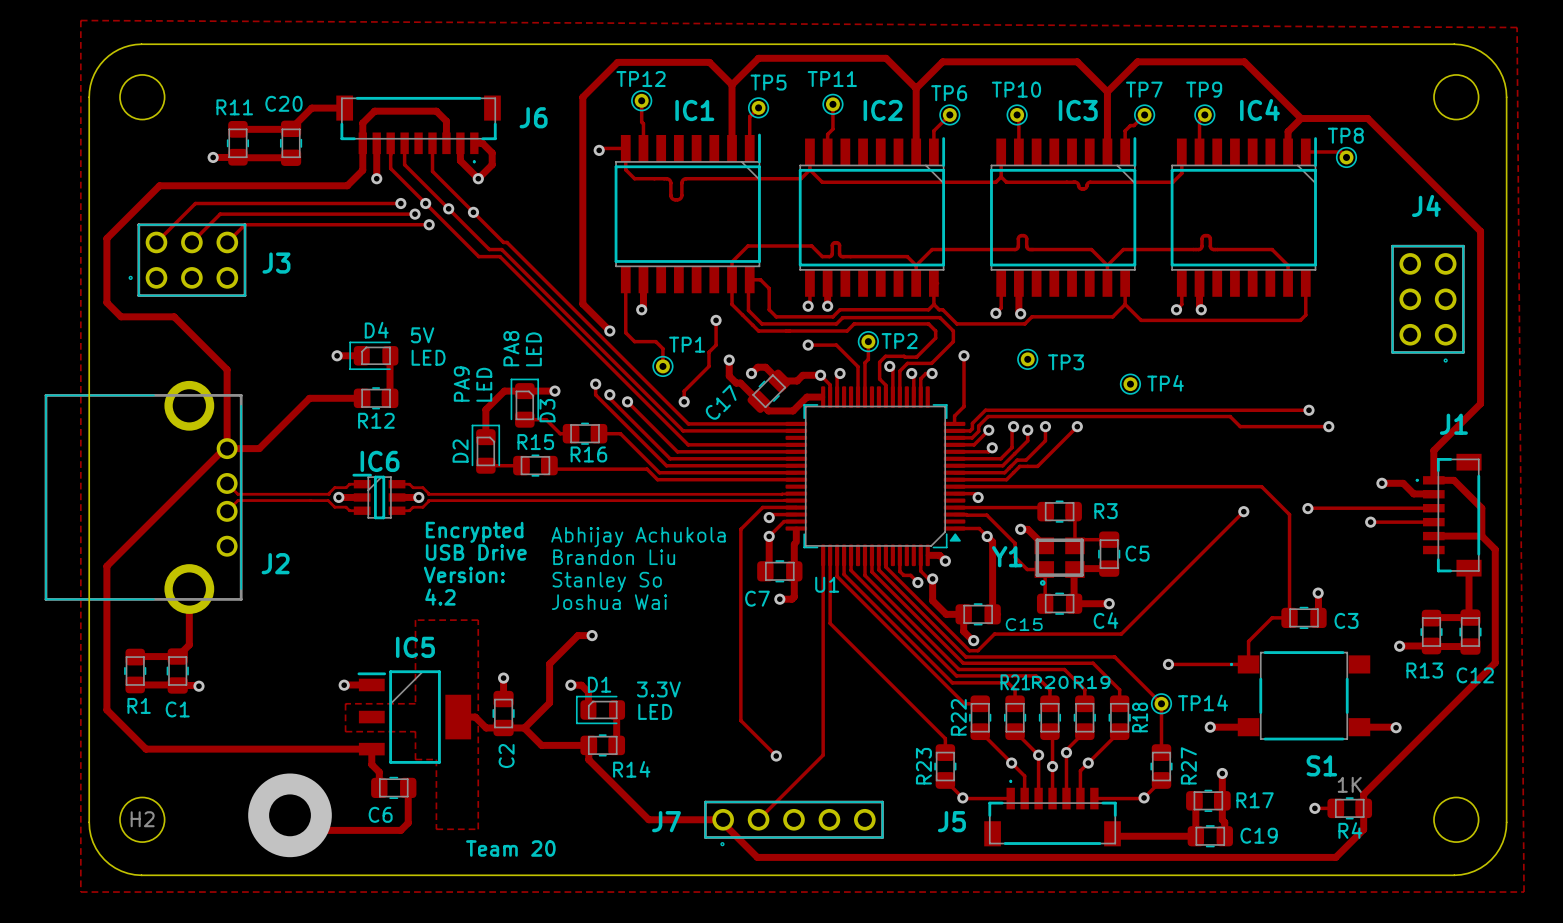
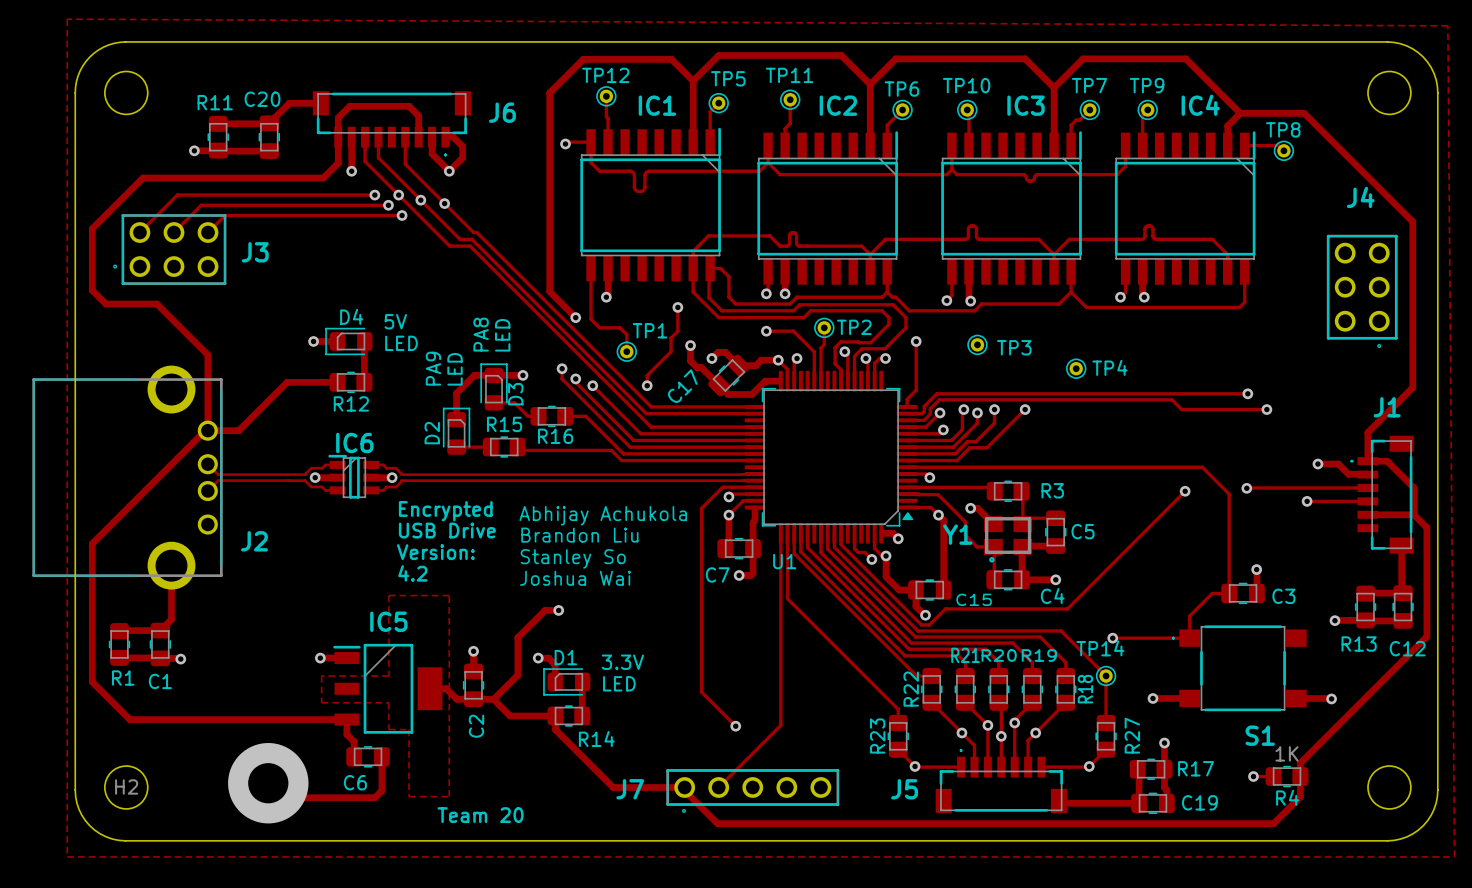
TP14 name position: TP14 (1203, 702) -> TP14 (1100, 648)

